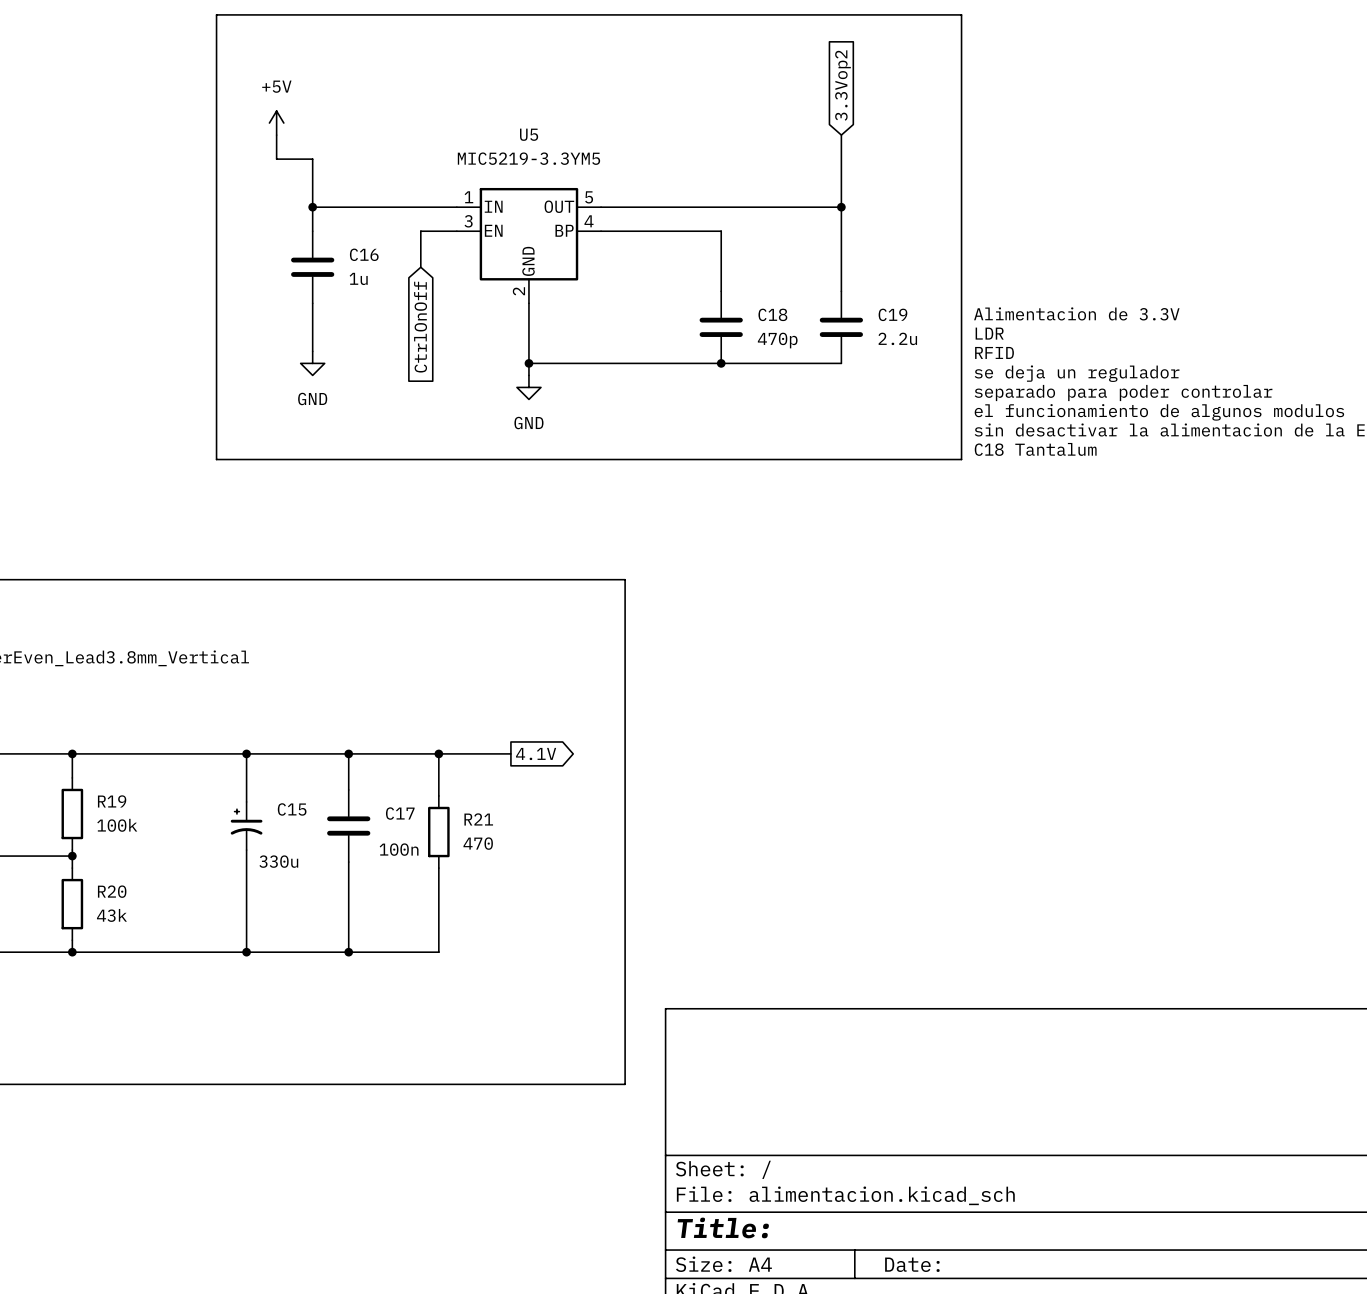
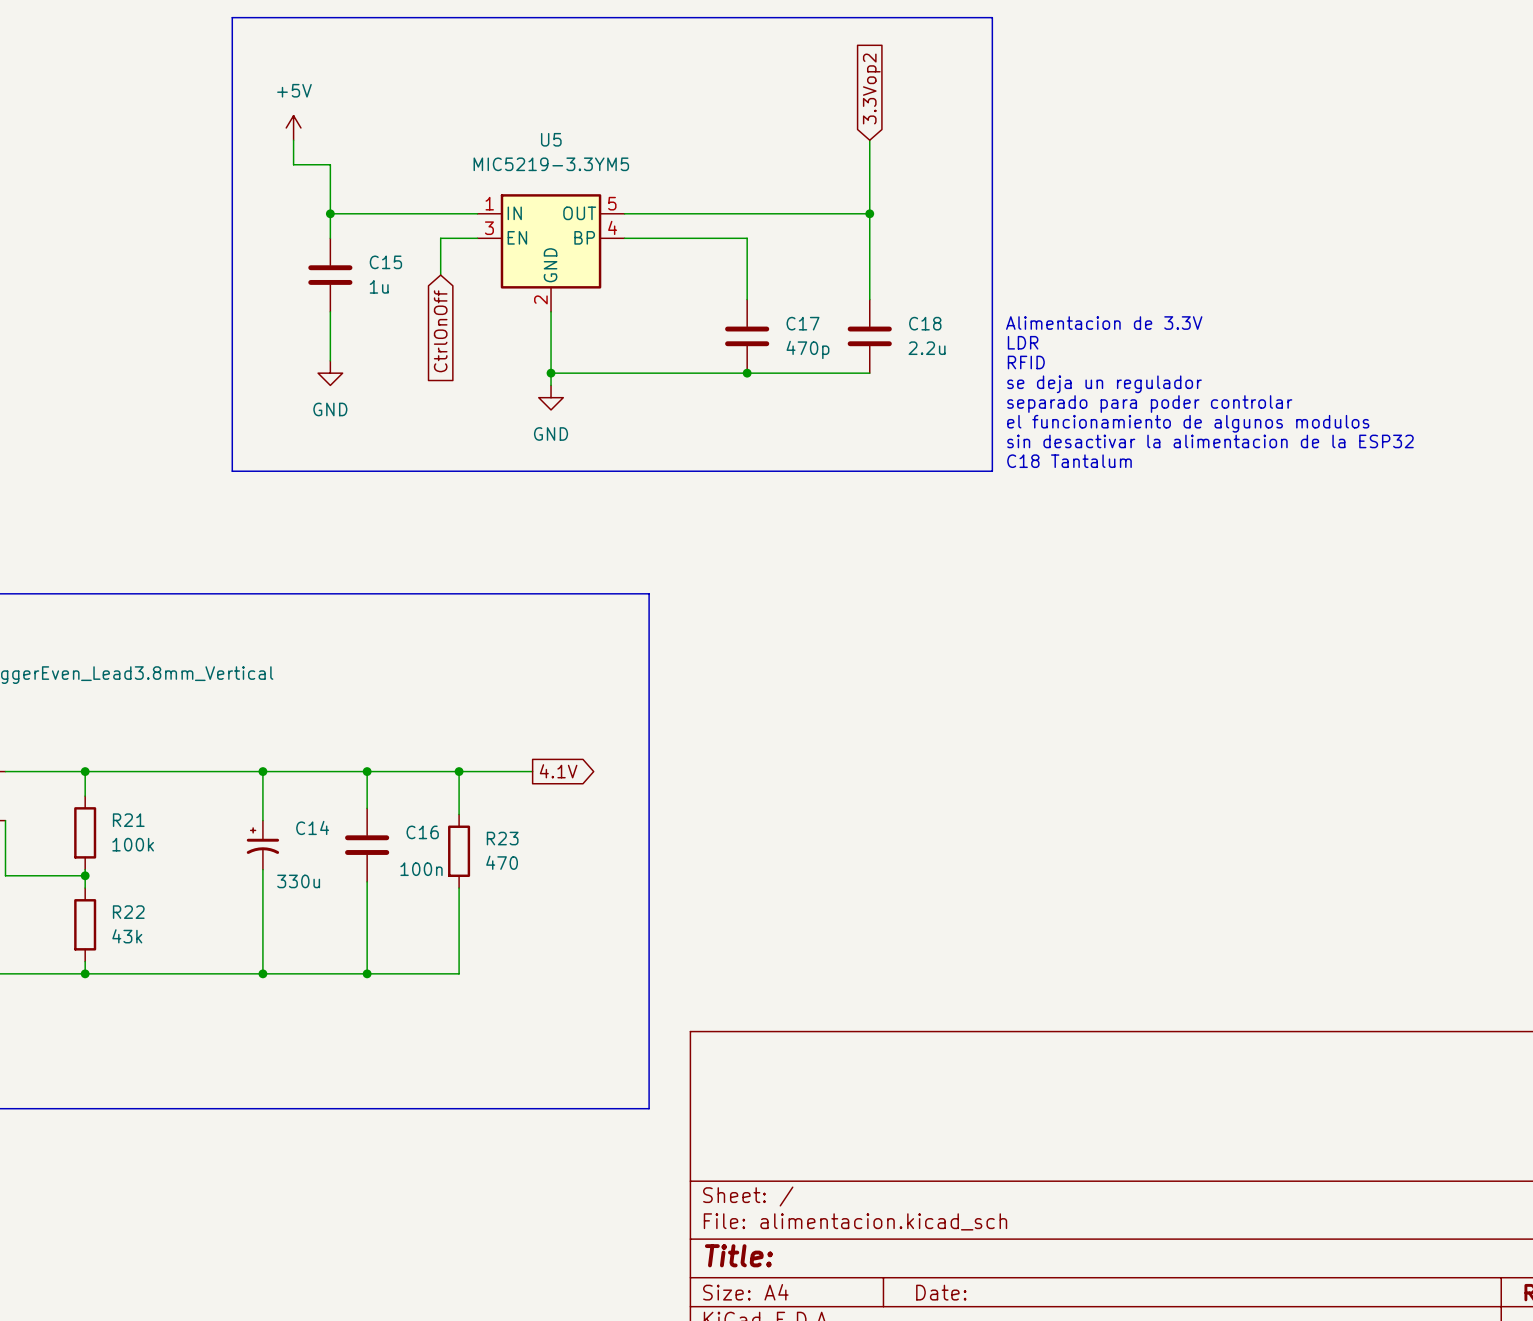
C16 name: C16 (364, 254) -> C15 (385, 262)
C18 name: C18 (772, 314) -> C17 (803, 323)
C19 name: C19 (892, 314) -> C18 (925, 323)
R19 name: R19 (112, 801) -> R21 (128, 820)
C15 name: C15 (292, 809) -> C14 (312, 827)
C17 name: C17 (400, 813) -> C16 (422, 832)
R21 name: R21 (478, 819) -> R23 (502, 838)
R20 name: R20 (112, 891) -> R22 (128, 912)

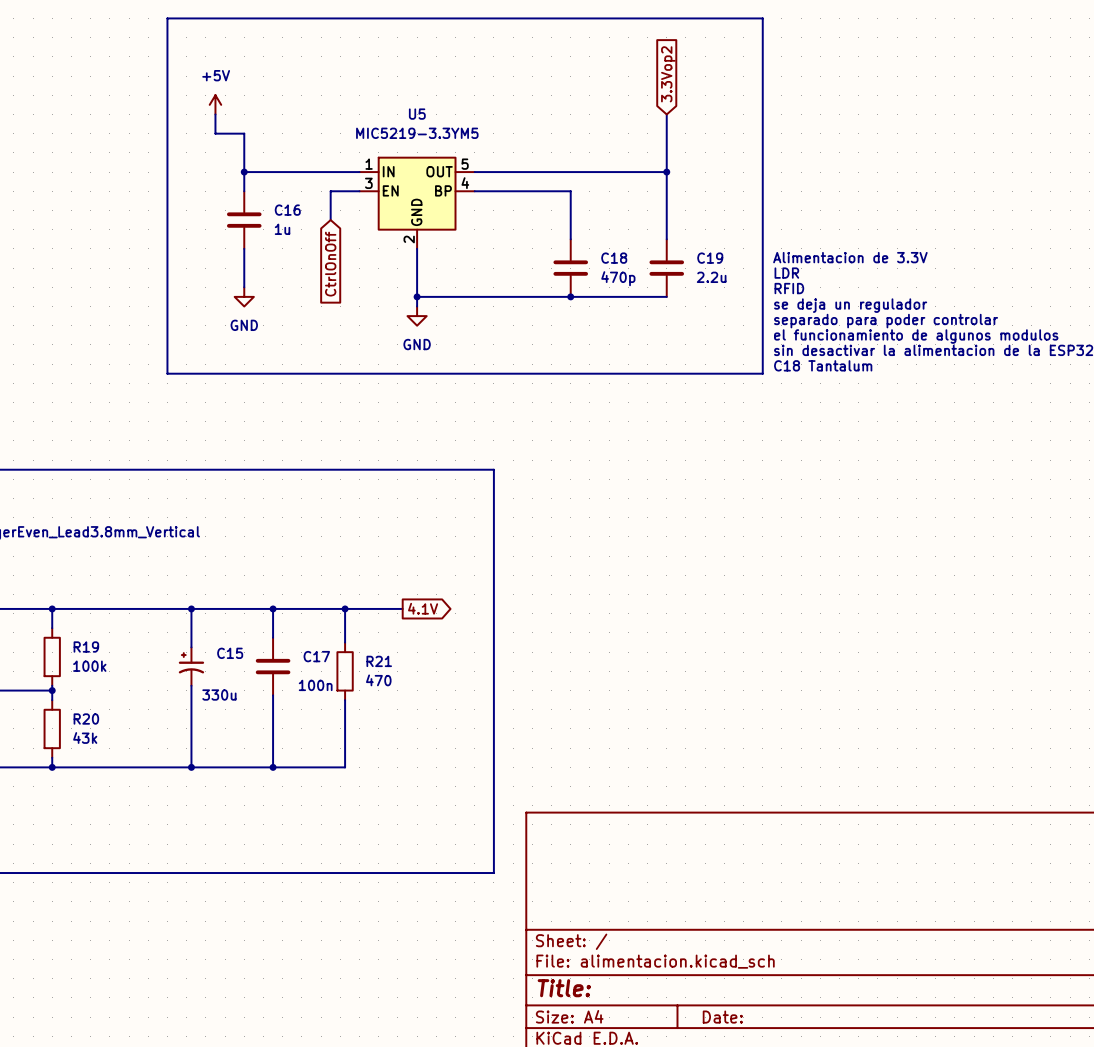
C15 name: C15 (385, 262) -> C16 (287, 210)
C17 name: C17 (803, 323) -> C18 (614, 258)
C18 name: C18 (925, 323) -> C19 (710, 258)
R21 name: R21 (128, 820) -> R19 (86, 647)
C14 name: C14 (312, 827) -> C15 (230, 653)
C16 name: C16 (422, 832) -> C17 (316, 656)
R23 name: R23 (502, 838) -> R21 (379, 661)
R22 name: R22 (128, 912) -> R20 (86, 719)

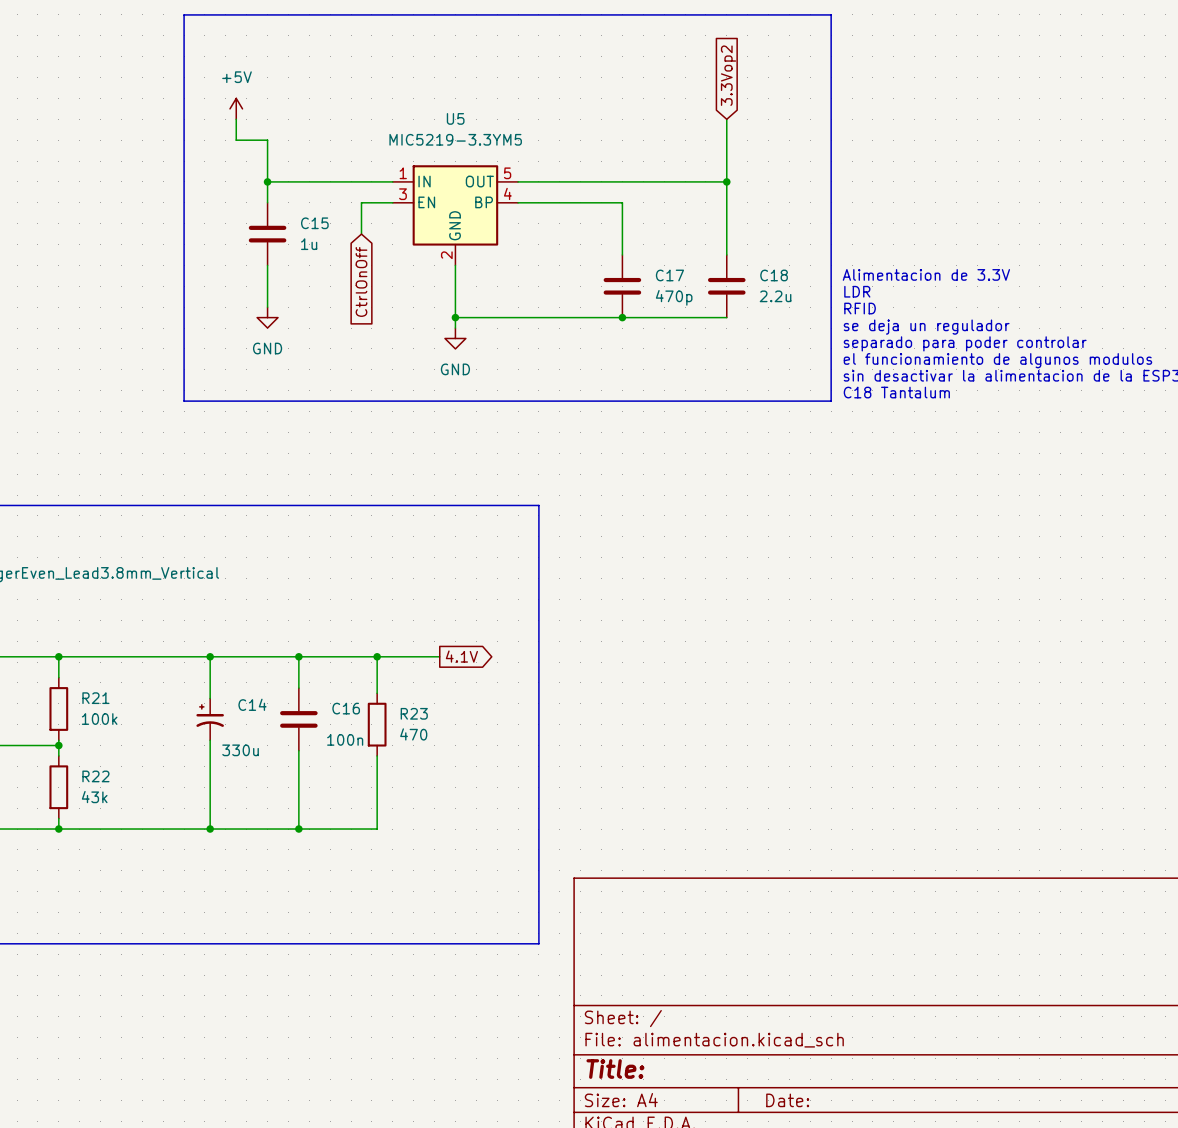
C16 name: C16 (287, 210) -> C15 (314, 223)
C18 name: C18 (614, 258) -> C17 (669, 275)
C19 name: C19 (710, 258) -> C18 (774, 275)
R19 name: R19 (86, 647) -> R21 (95, 698)
C15 name: C15 (230, 653) -> C14 (252, 704)
C17 name: C17 (316, 656) -> C16 (346, 708)
R21 name: R21 (379, 661) -> R23 (414, 713)
R20 name: R20 (86, 719) -> R22 (95, 776)

